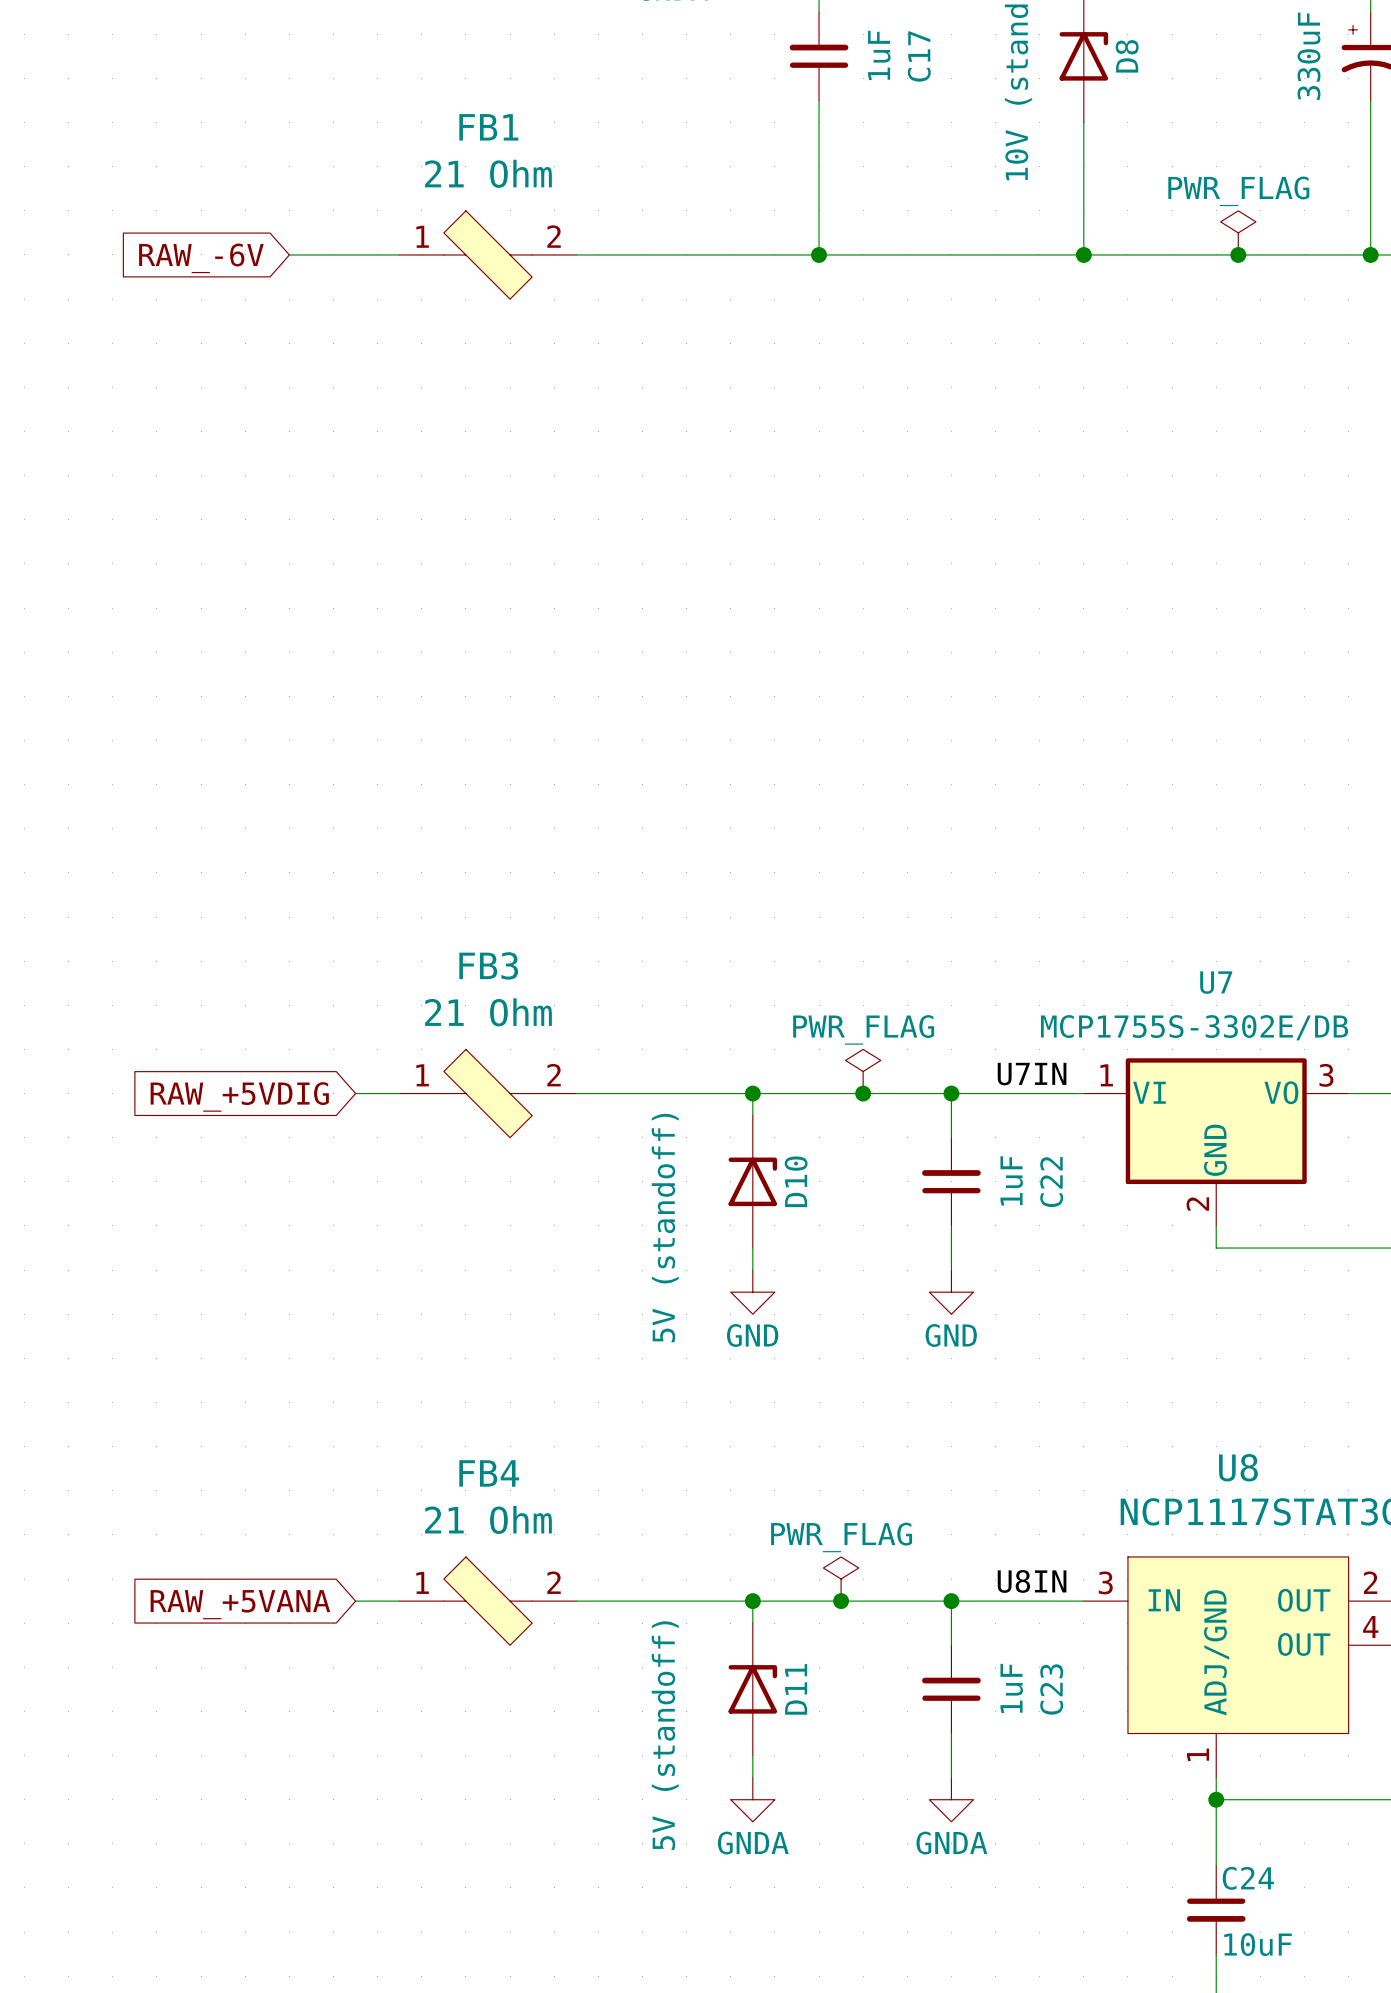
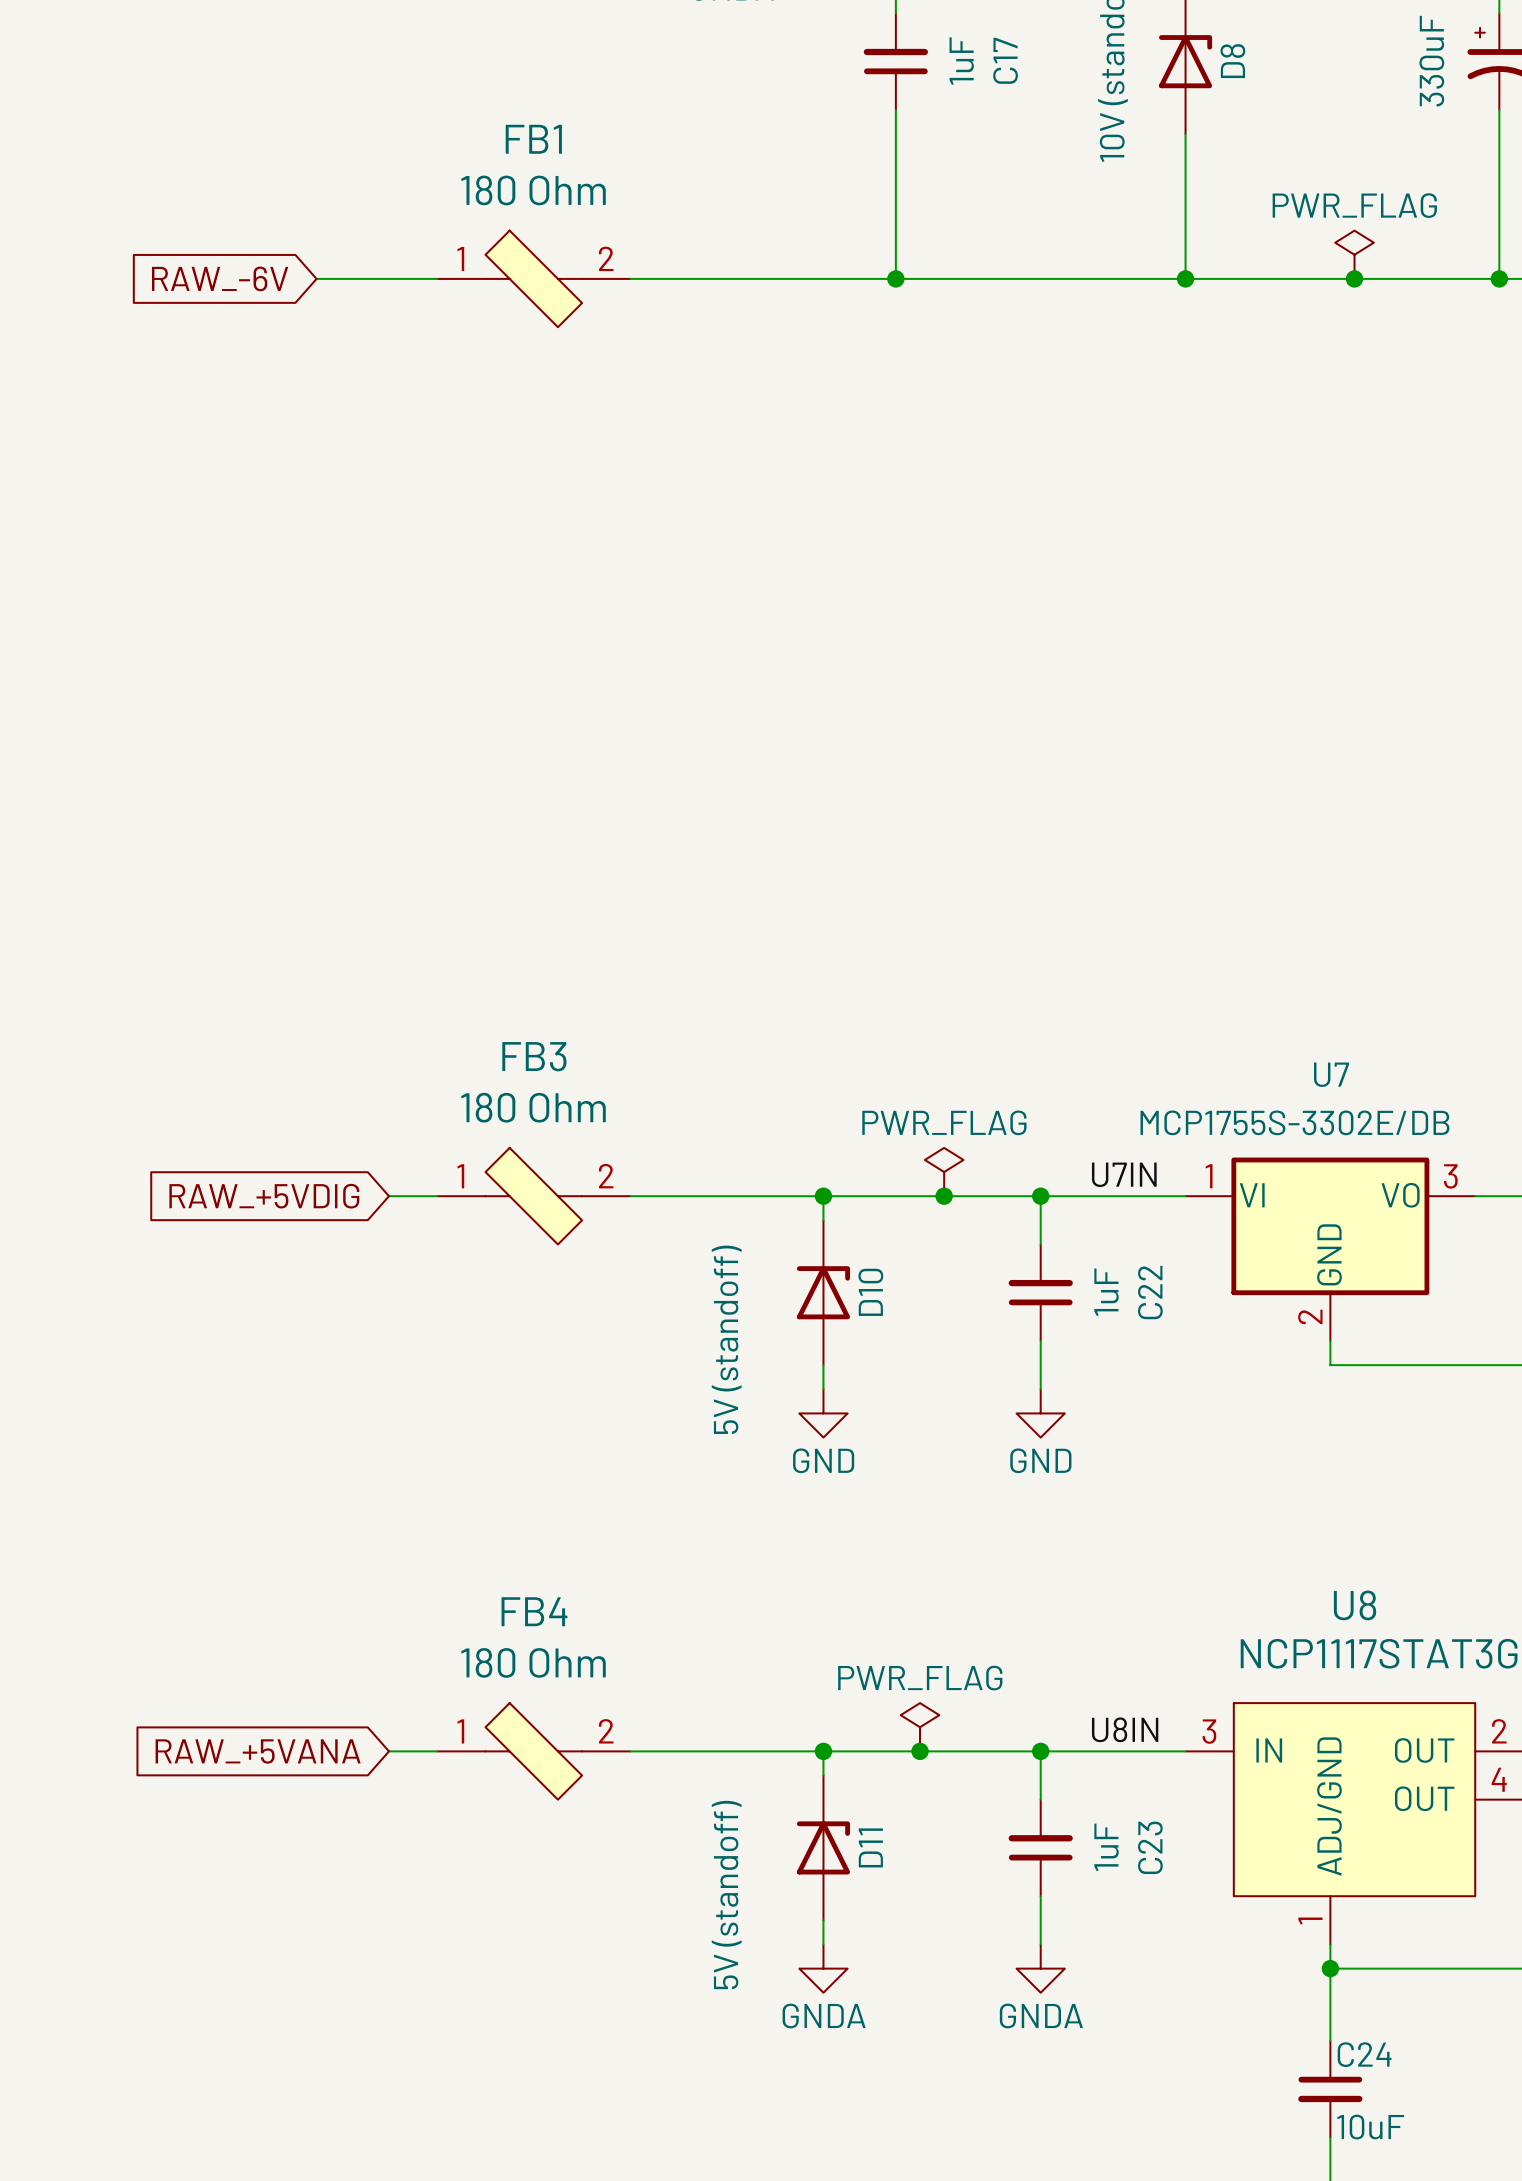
FB1 value: 21 Ohm (488, 173) -> 180 Ohm (533, 190)
FB3 value: 21 Ohm (488, 1012) -> 180 Ohm (533, 1107)
FB4 value: 21 Ohm (488, 1519) -> 180 Ohm (533, 1662)

